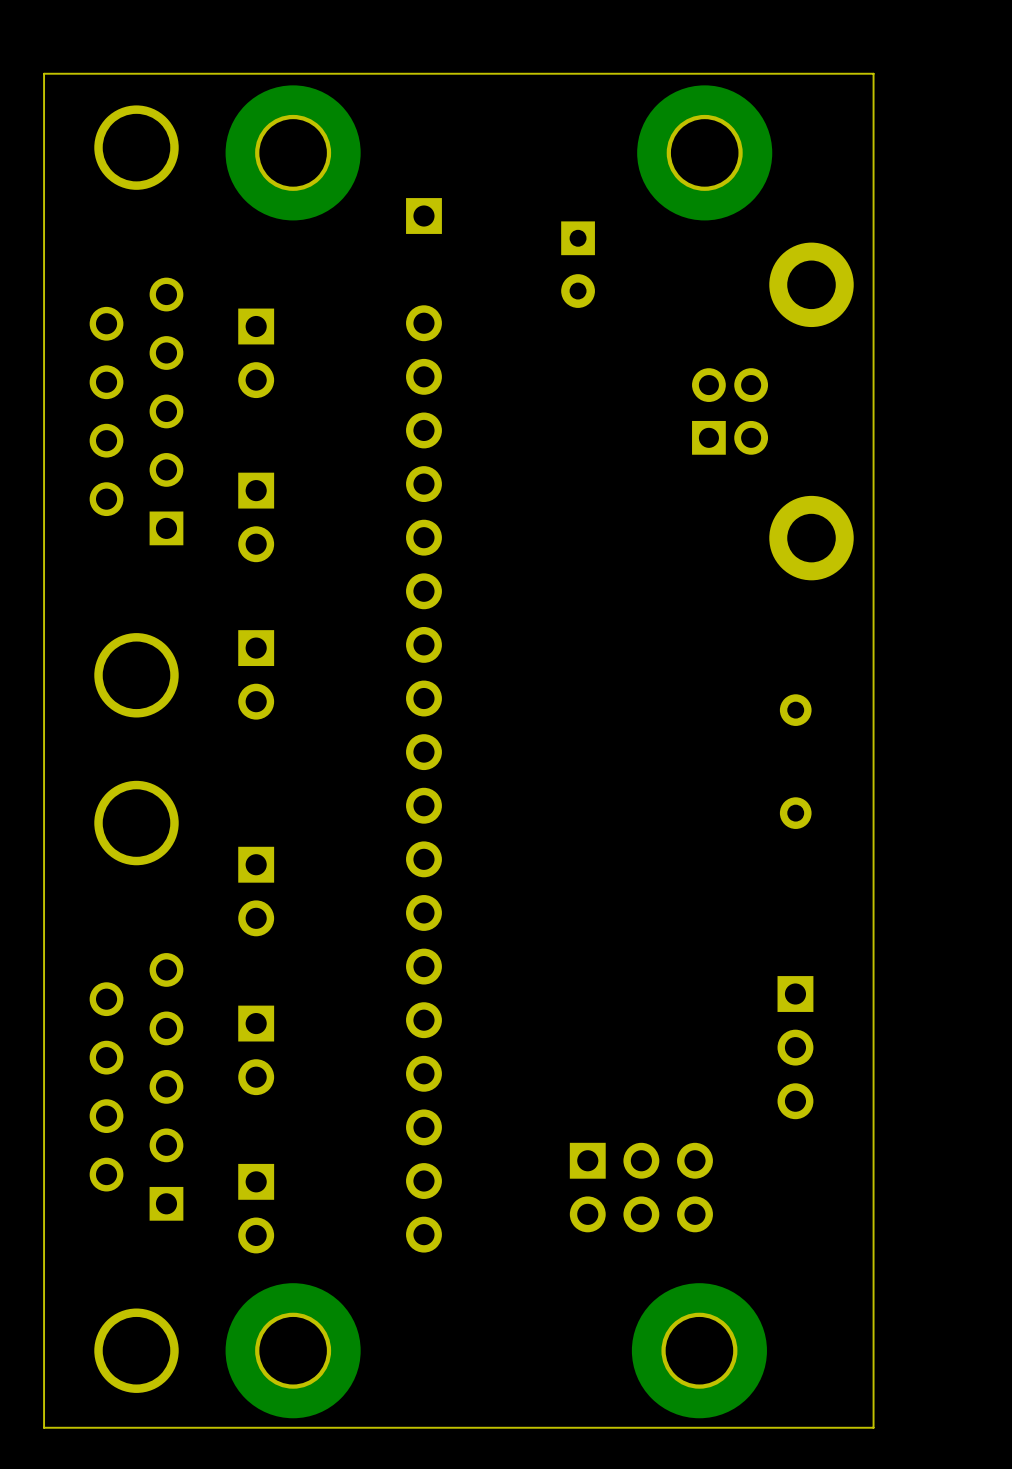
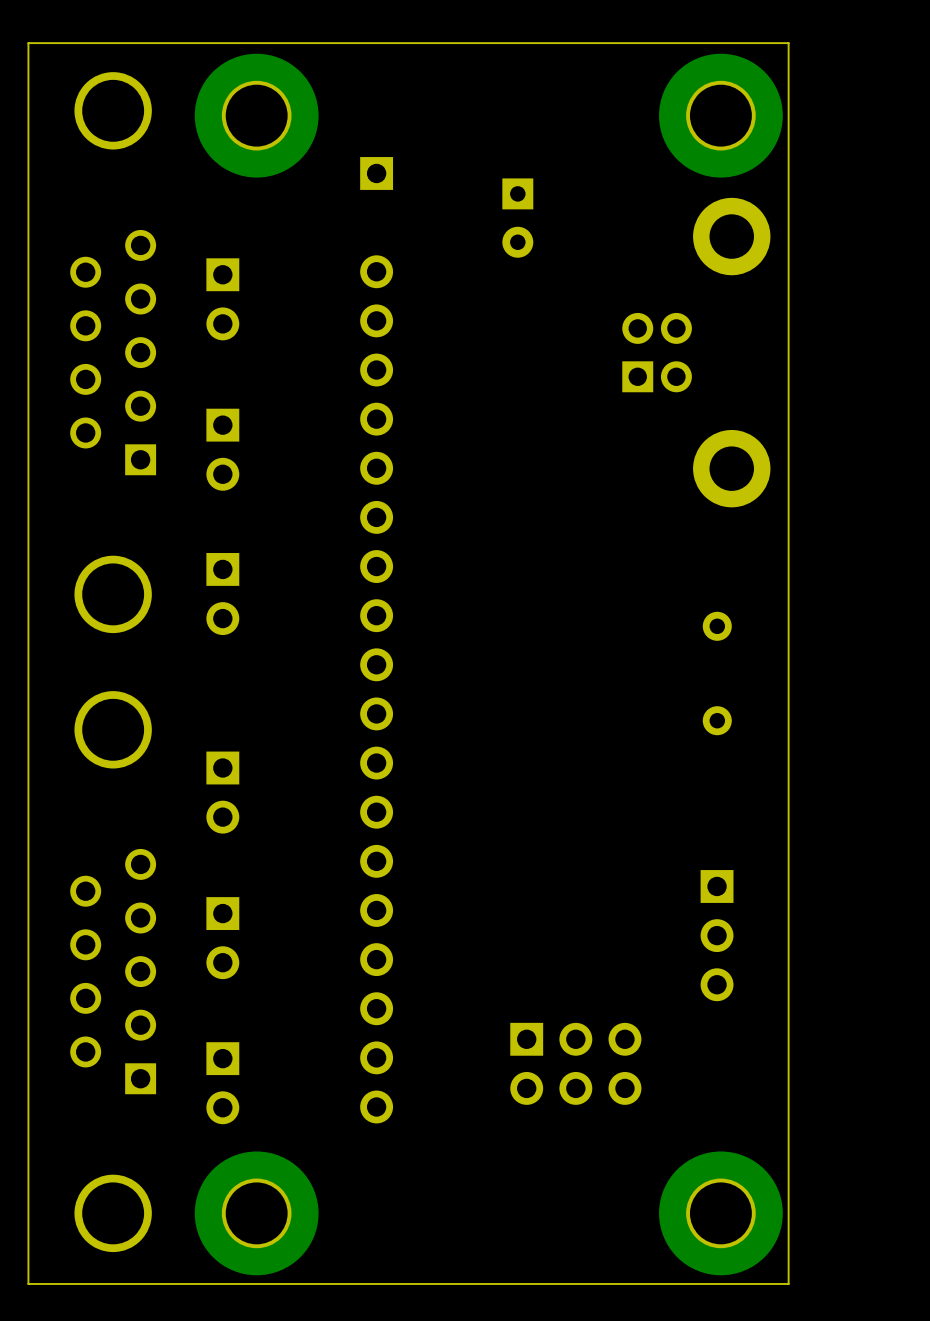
part position: (704, 152) -> (720, 115)
part position: (699, 1350) -> (720, 1213)

